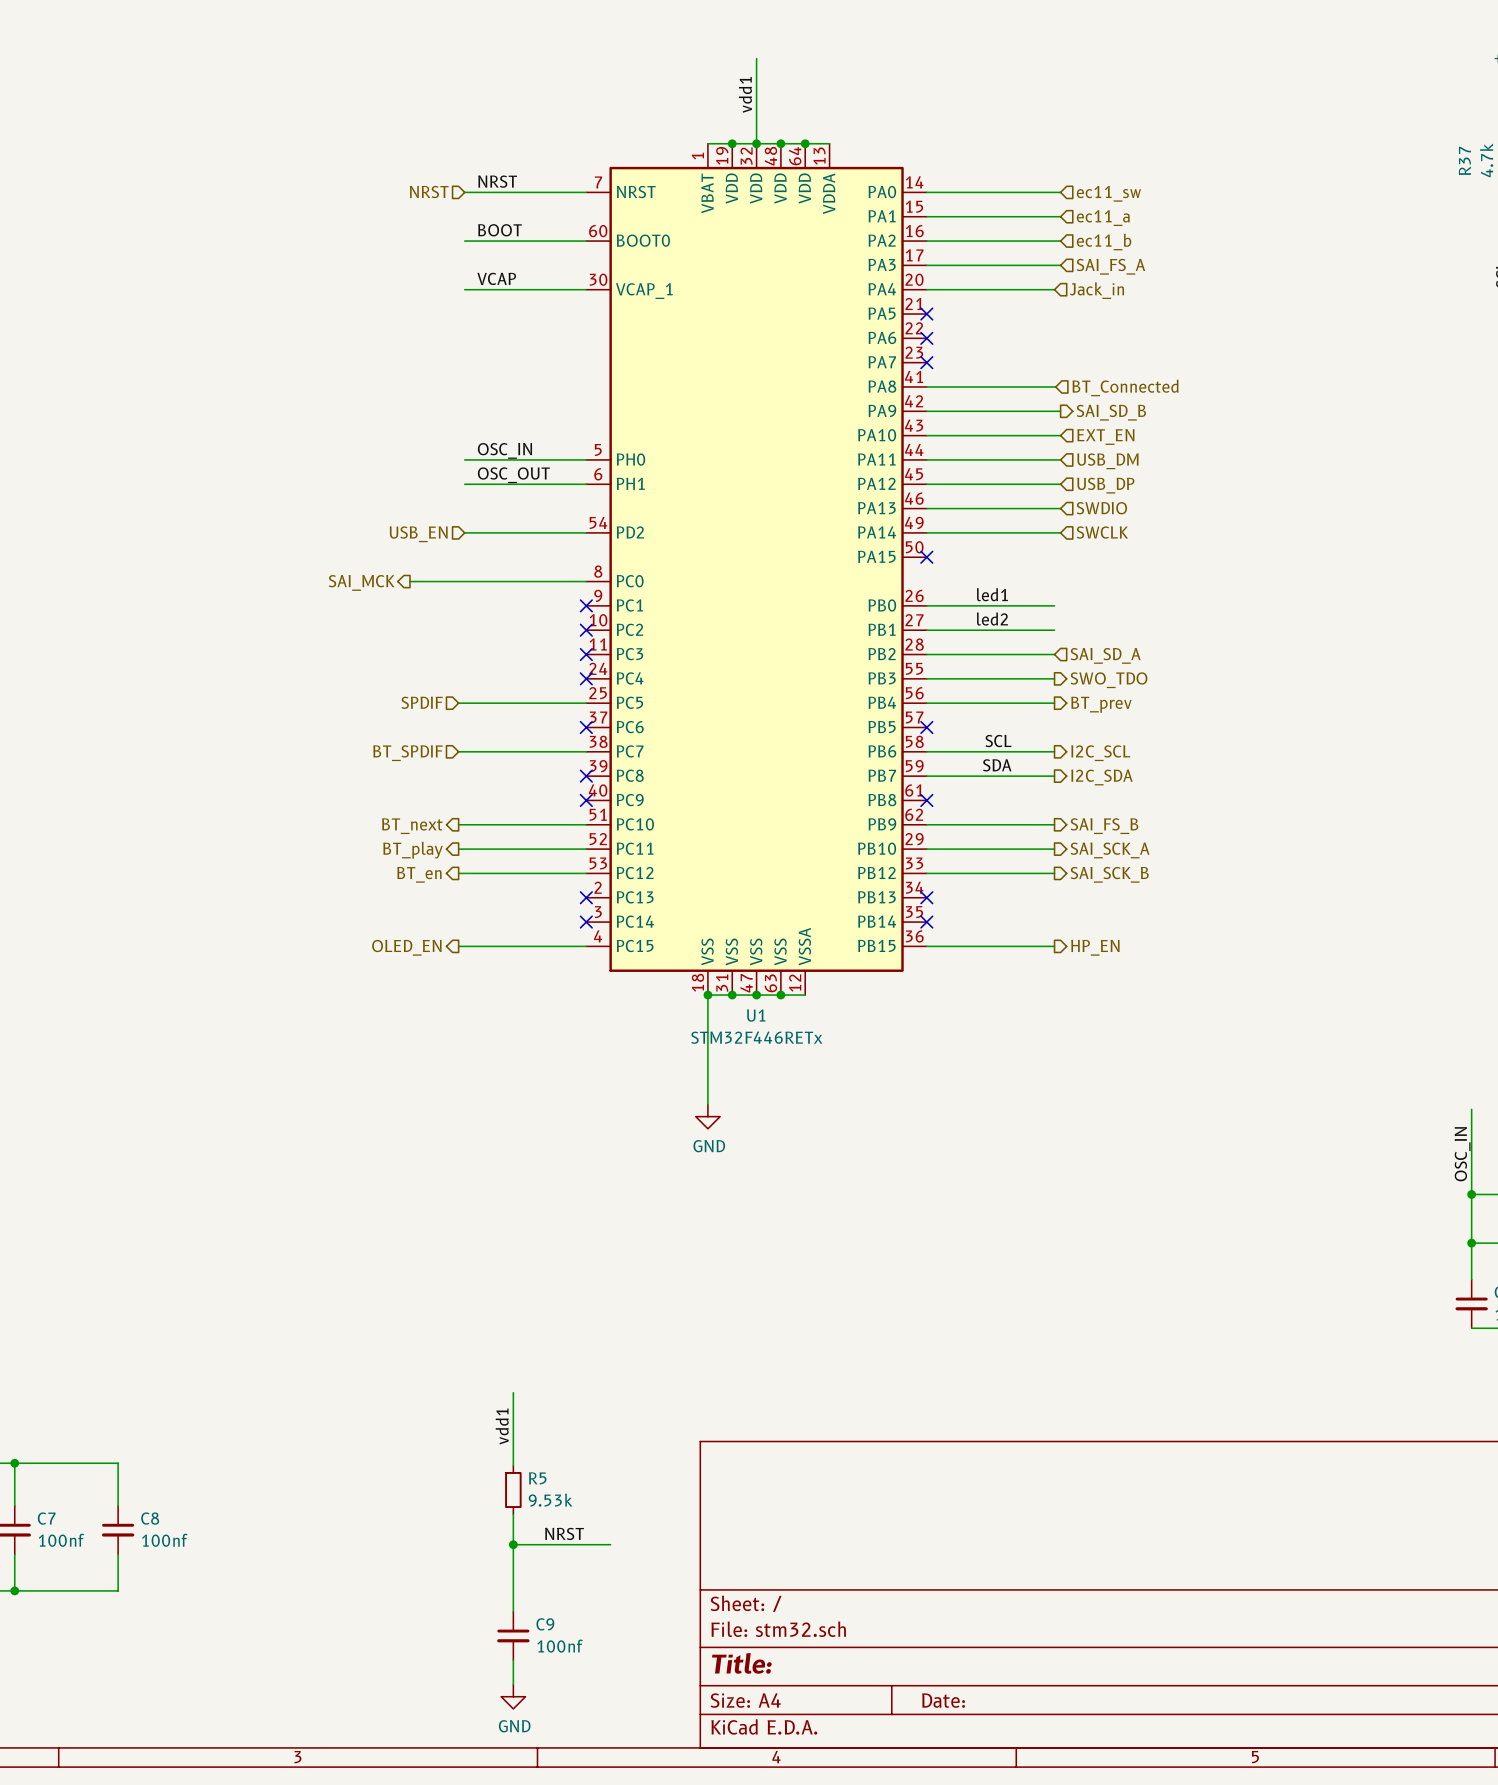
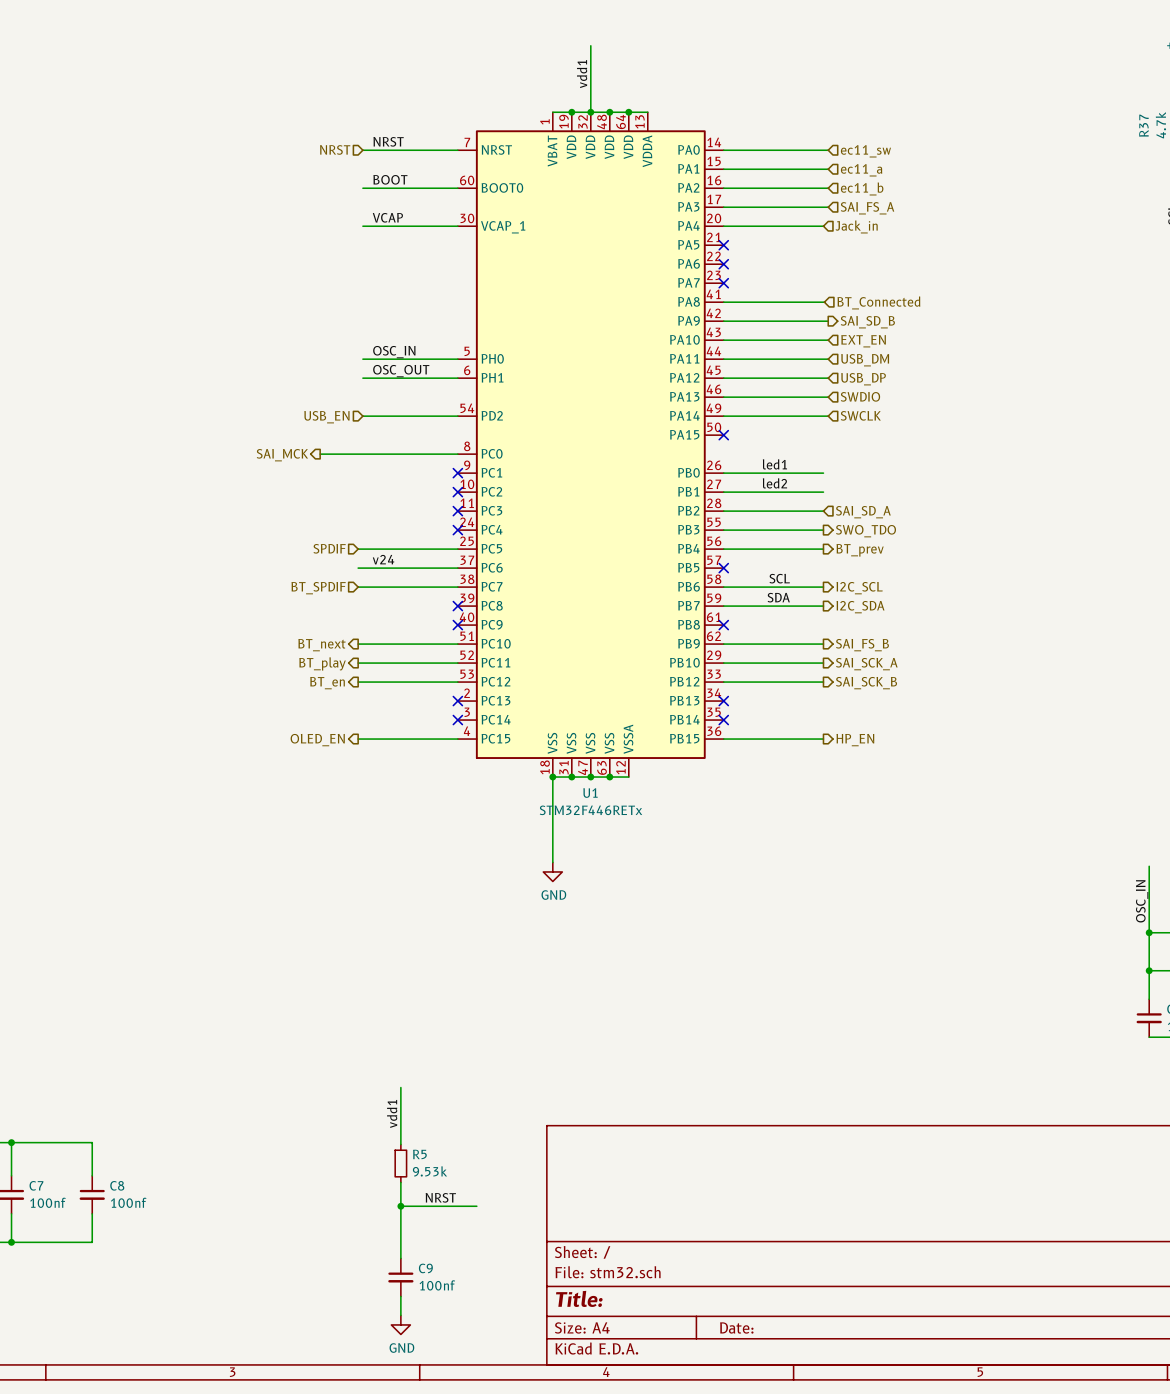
label: none -> v24 (383, 559)
wire: none -> (358, 568) (457, 568)
no-connect mark: (586, 727) -> none

